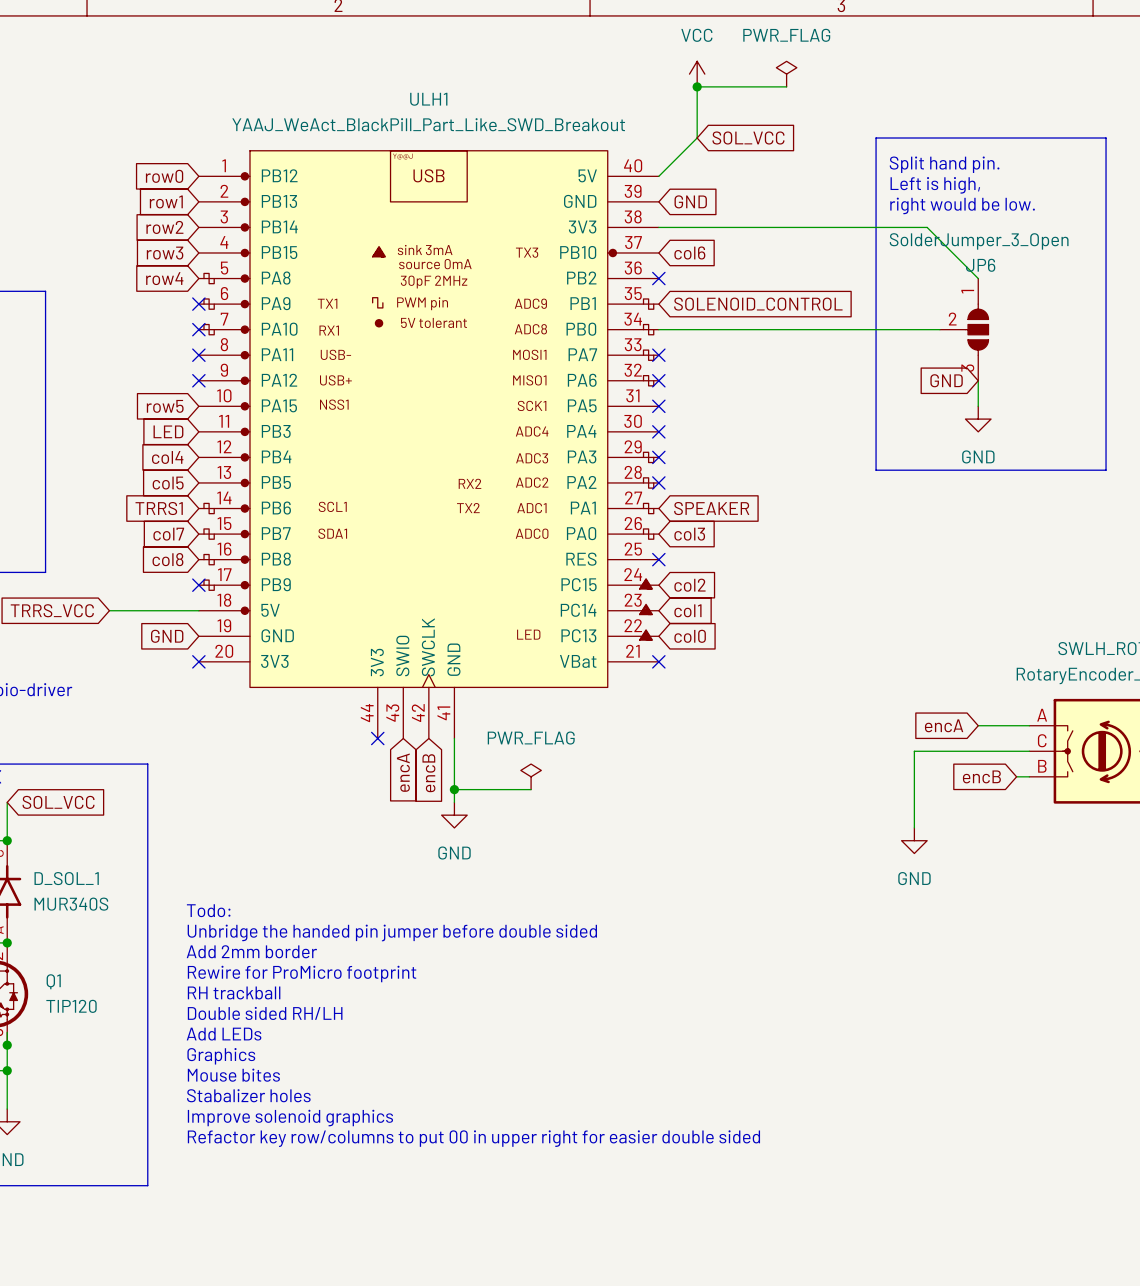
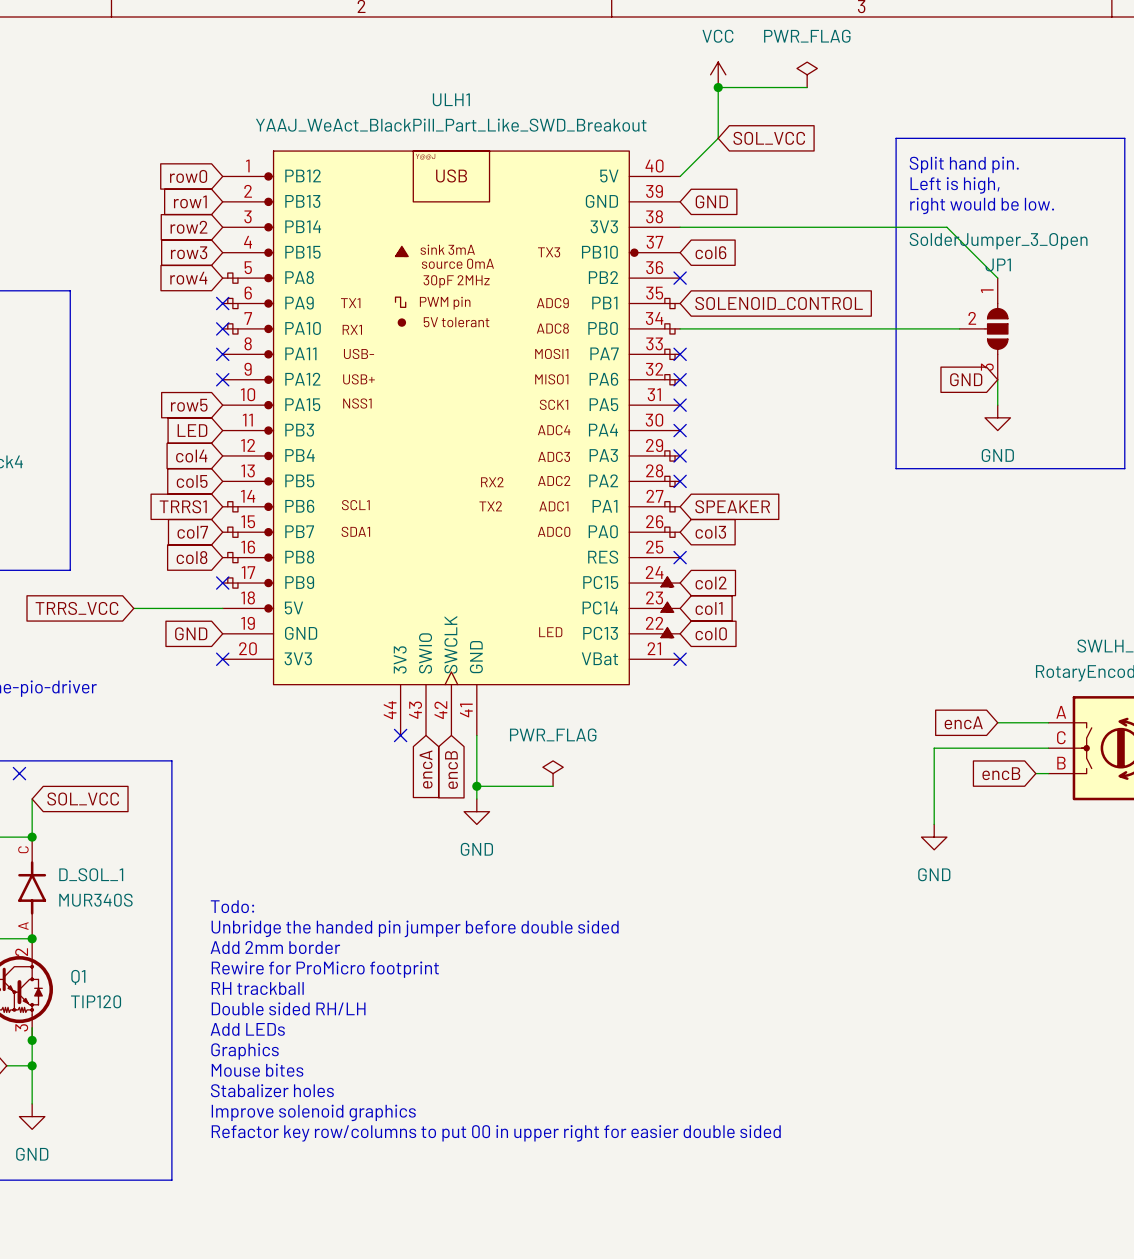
JP6 name: JP6 (980, 265) -> JP1 (998, 264)

